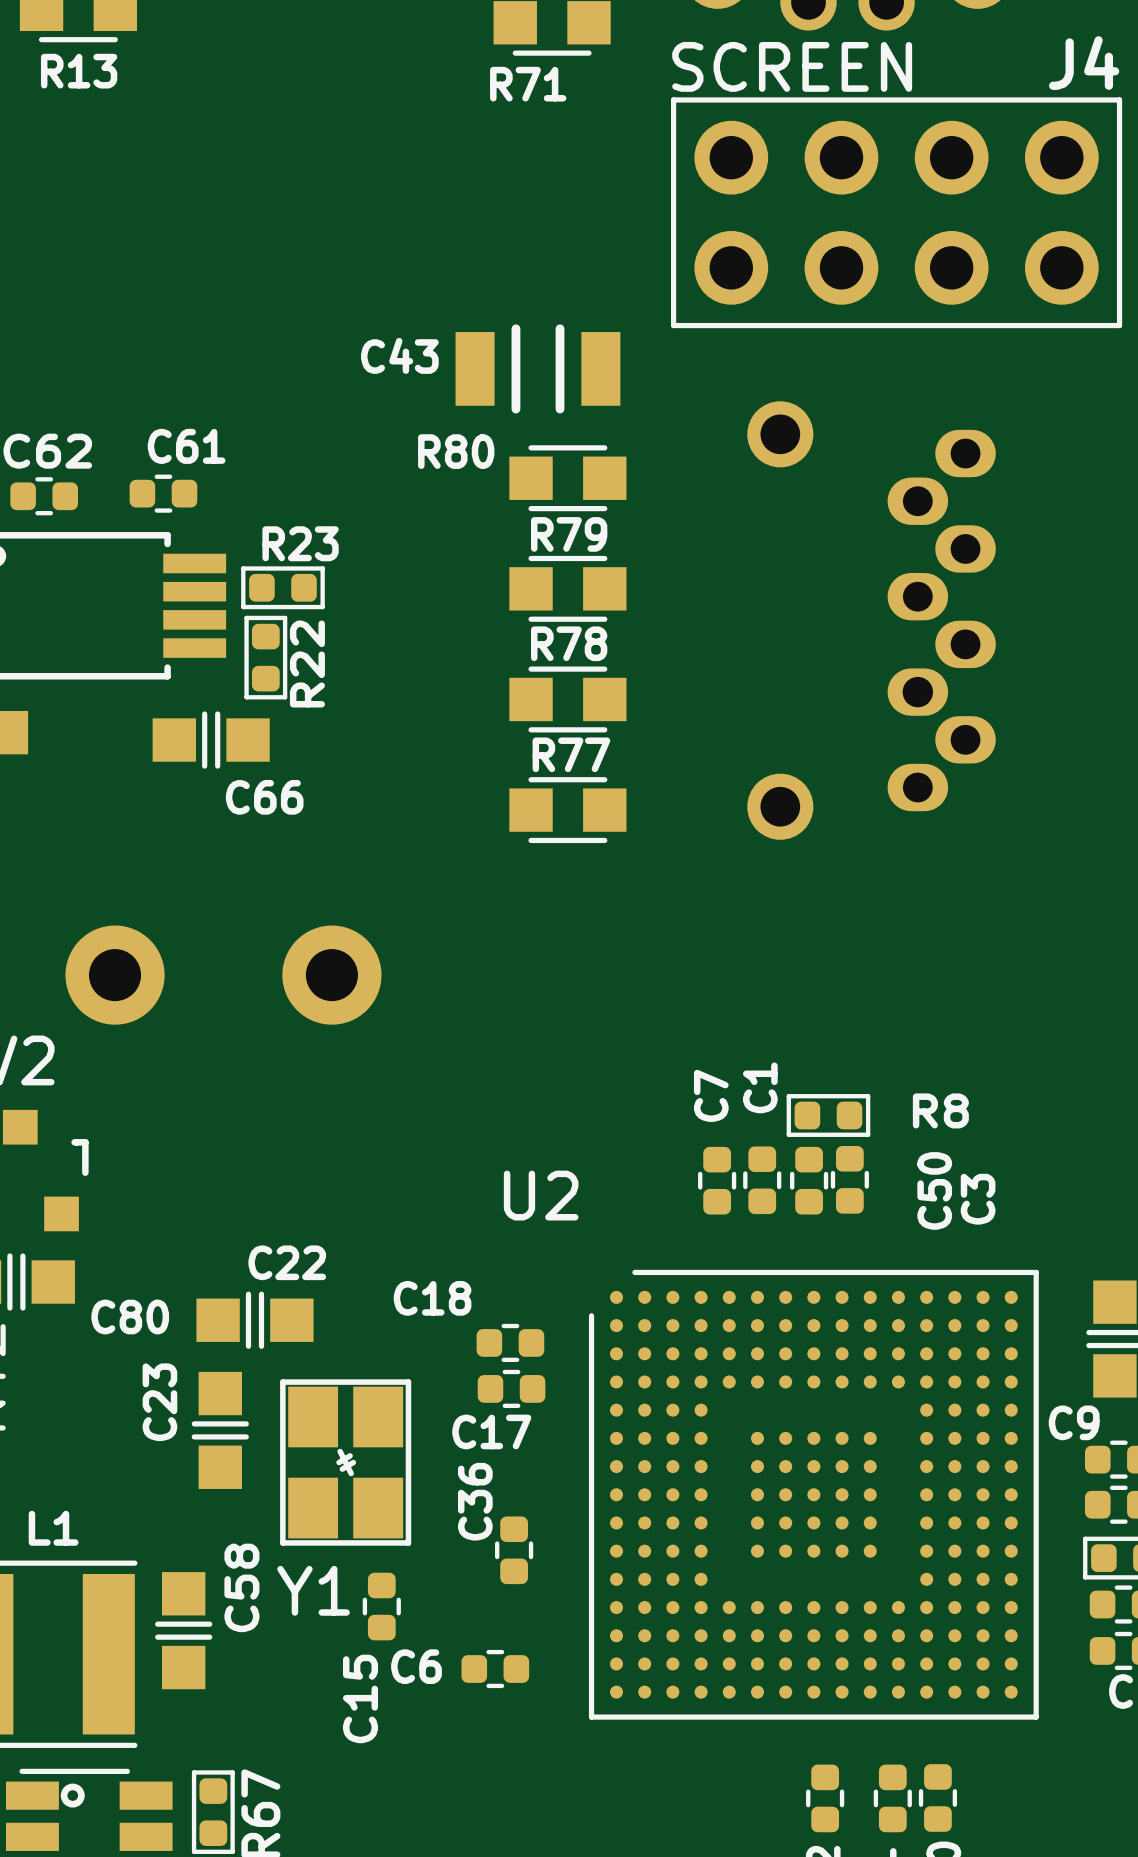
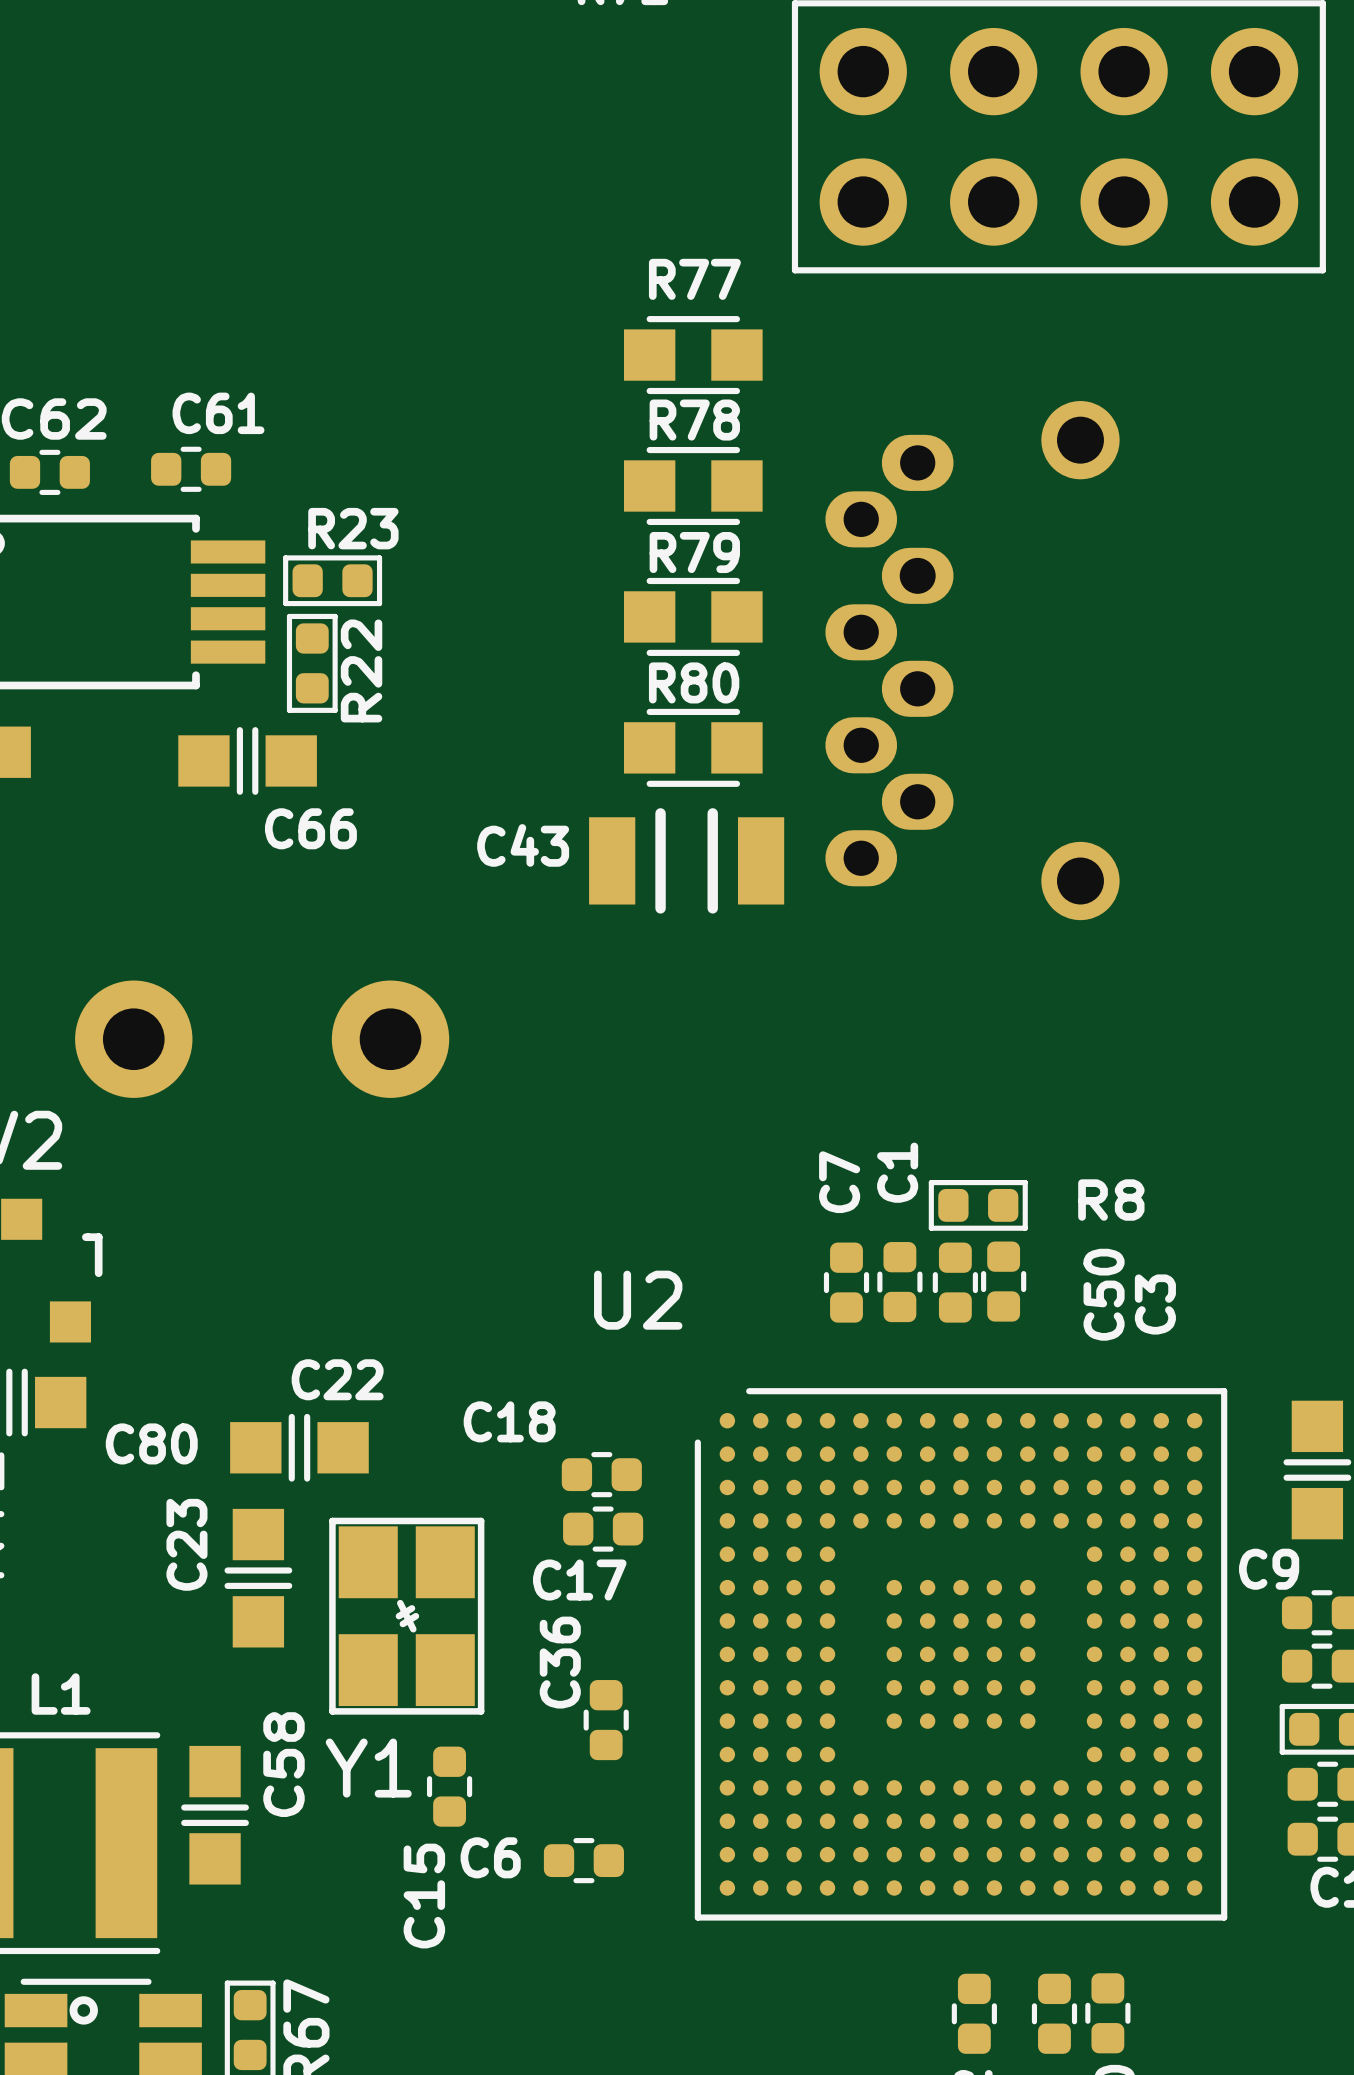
C43 position: (537, 368) -> (686, 860)
R80 name position: R80 (456, 451) -> R80 (694, 682)
R80 position: (567, 478) -> (693, 747)
R79 position: (567, 588) -> (693, 616)
part rotation: 0° (871, 620) -> 180° (972, 660)
R78 position: (567, 699) -> (693, 485)
R77 name position: R77 (571, 754) -> R77 (694, 279)
R77 position: (567, 810) -> (693, 355)

